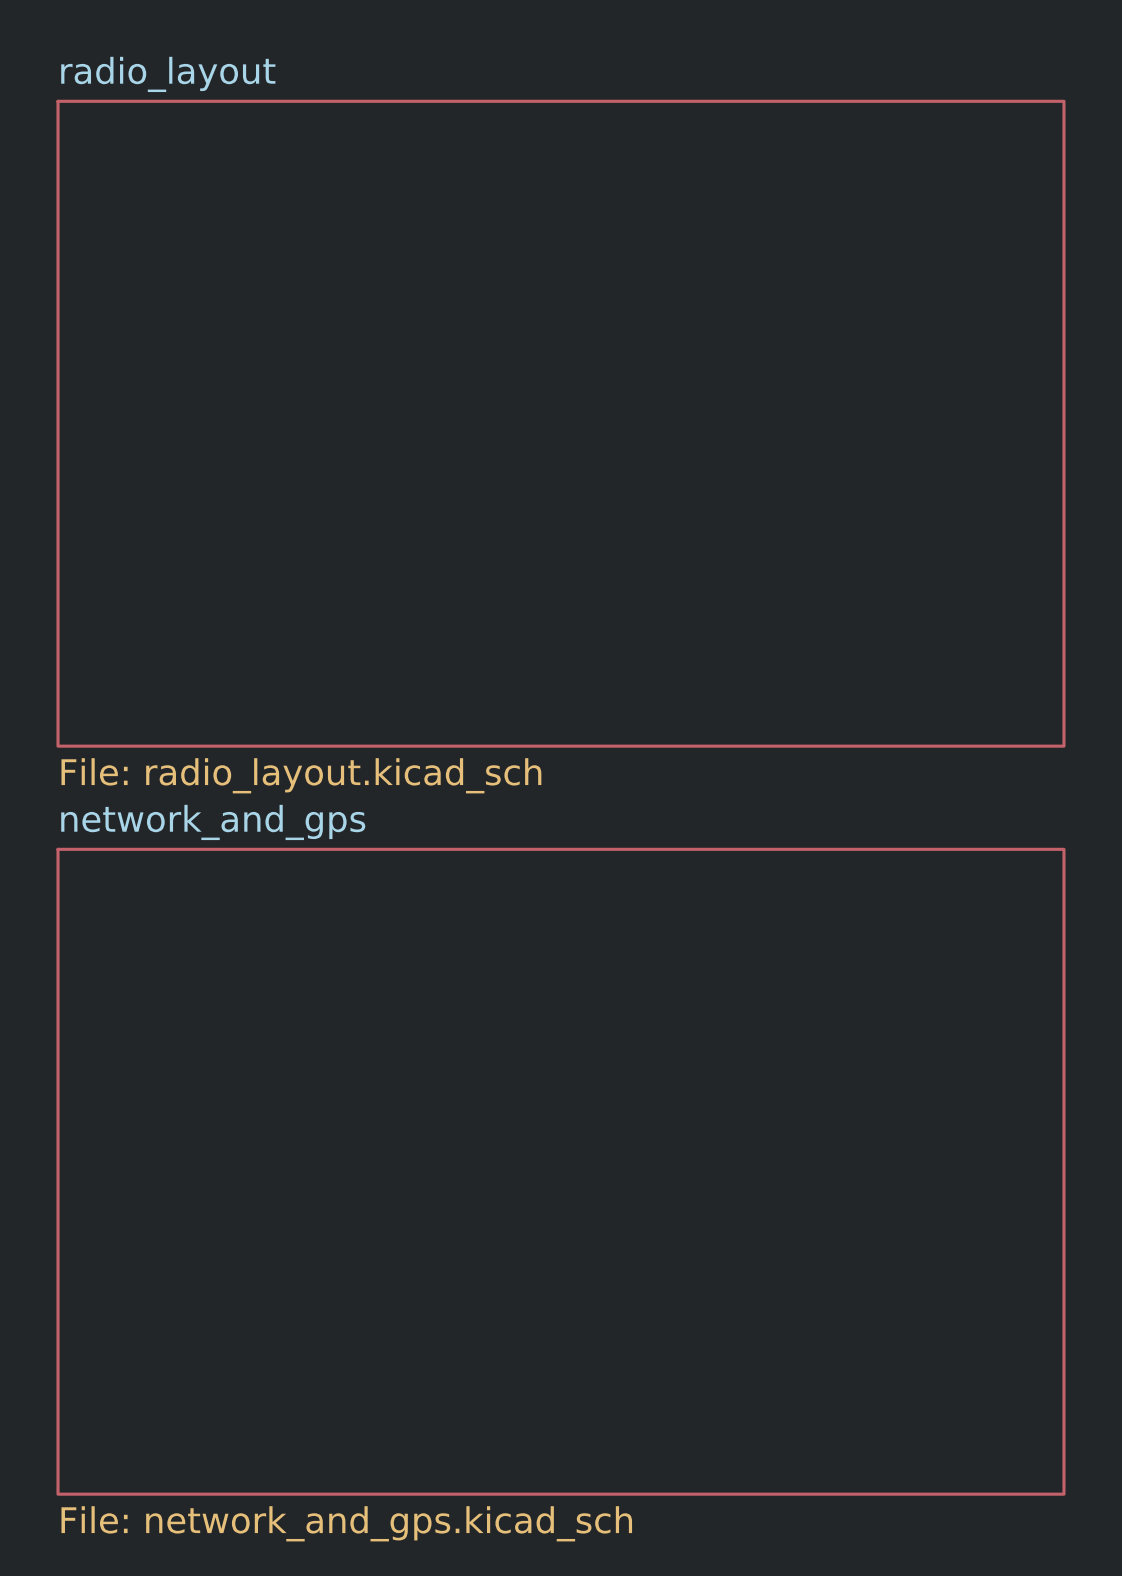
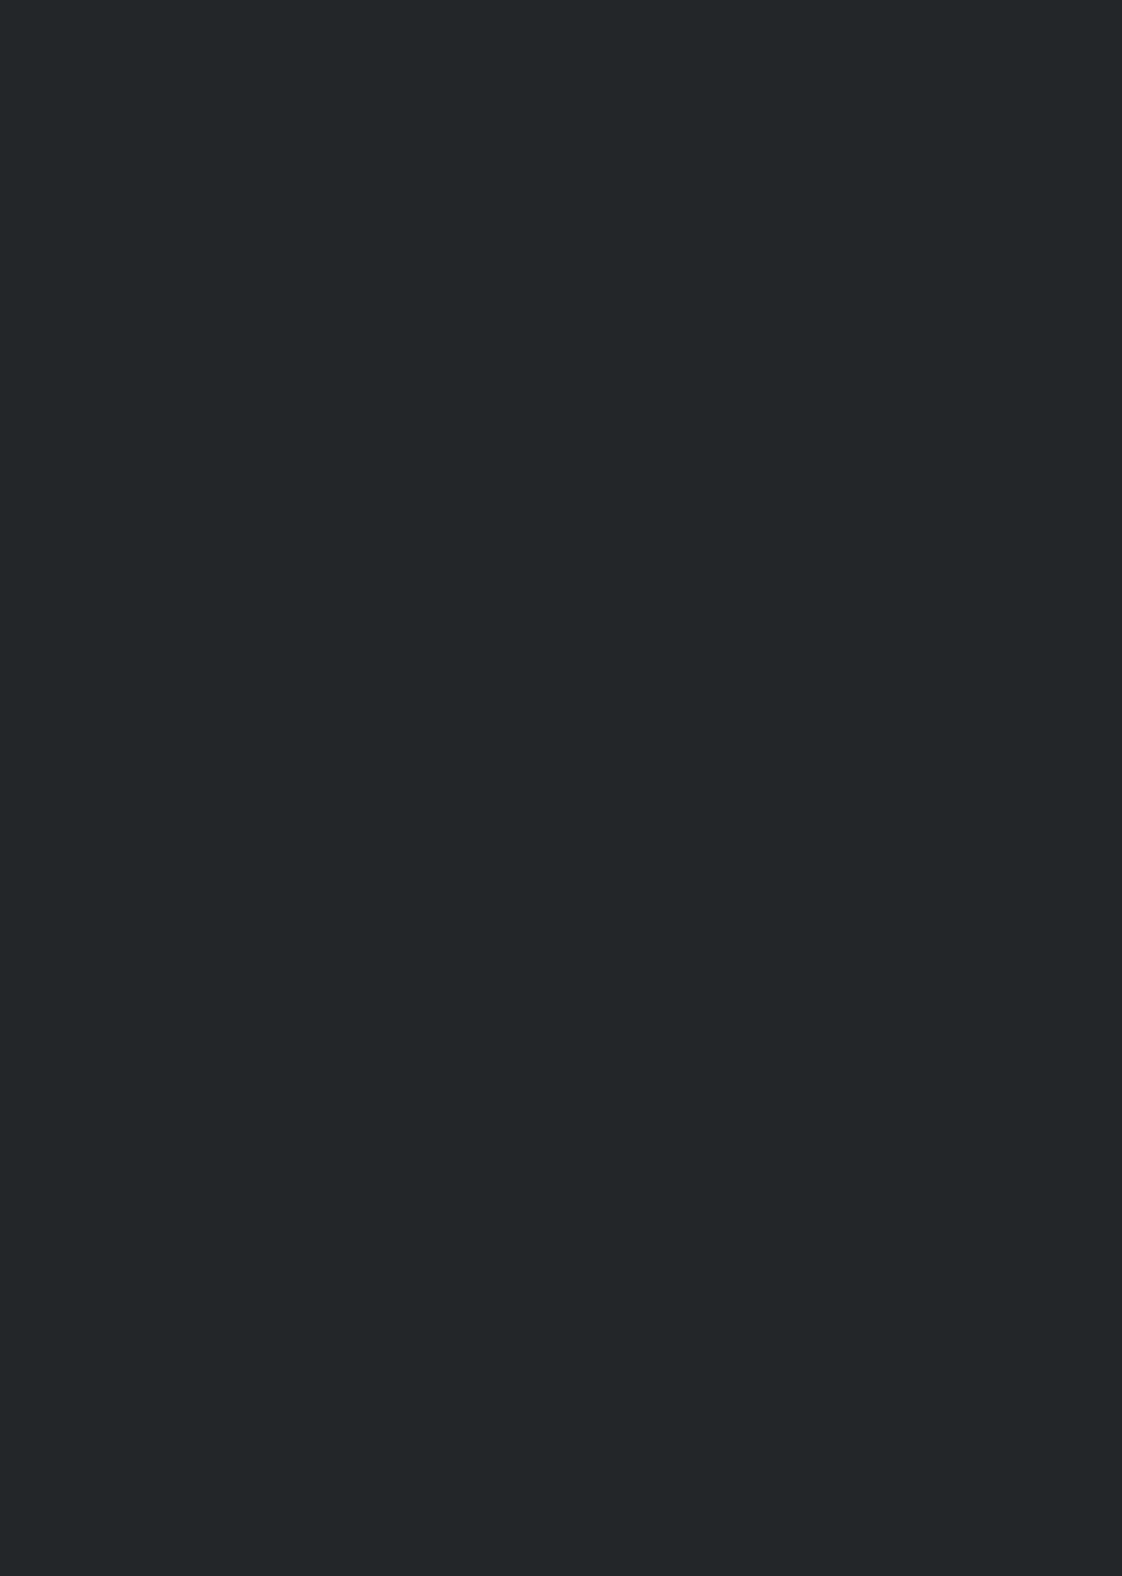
sheet radio_layout: File: radio_layout.kicad_sch (560, 423) -> none
sheet network_and_gps: File: network_and_gps.kicad_sch (560, 1171) -> none

